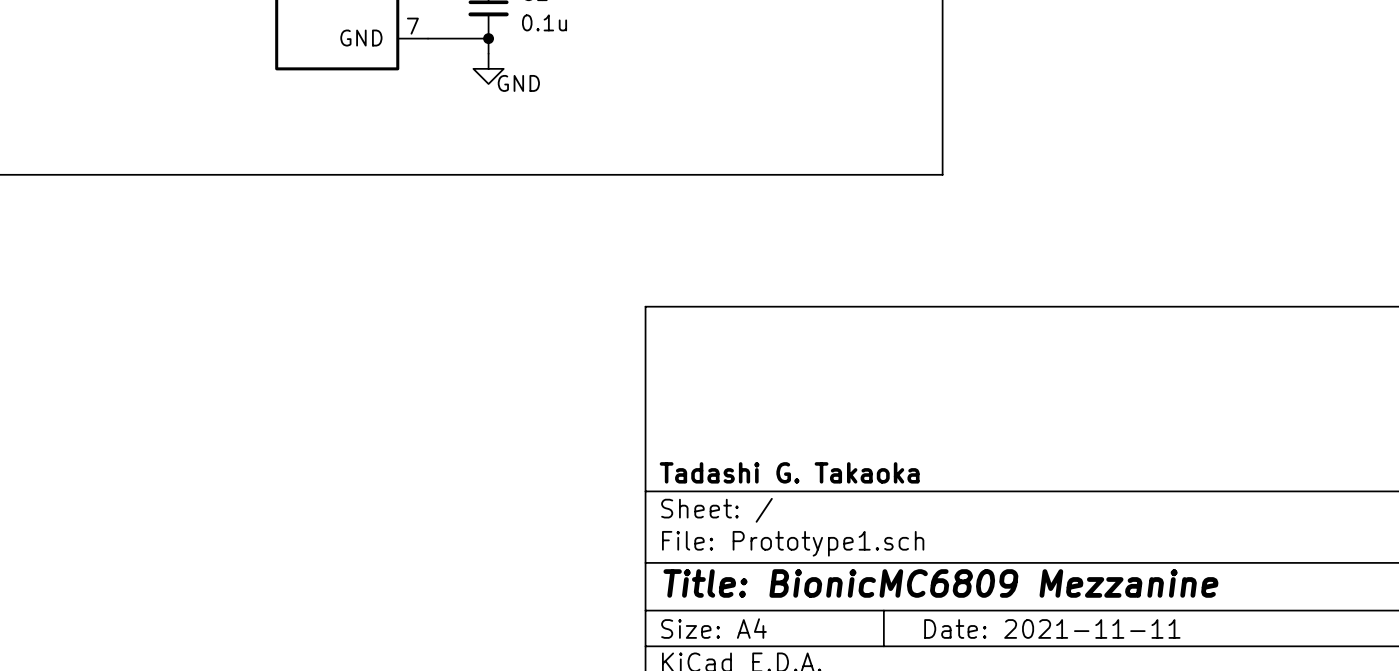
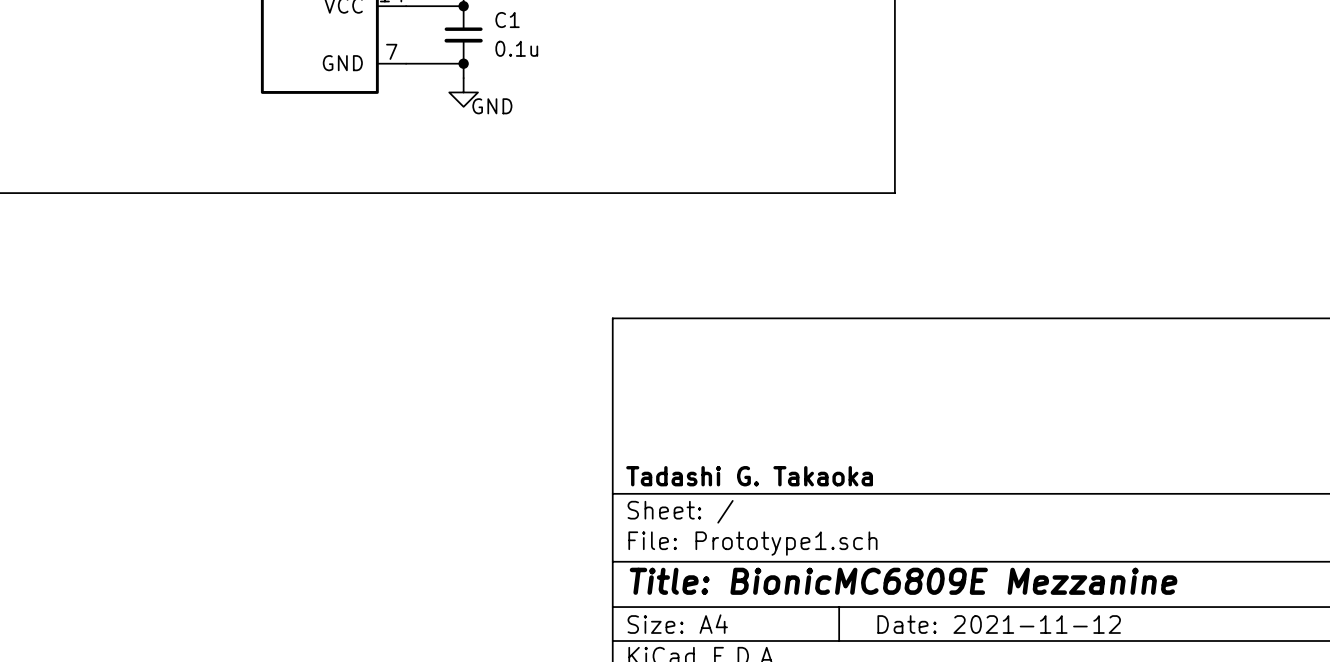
title block: Title: BionicMC6809 Mezzanine (940, 583) -> Title: BionicMC6809E Mezzanine (903, 581)
title block: Date: 2021-11-11 (1052, 628) -> Date: 2021-11-12 (999, 624)

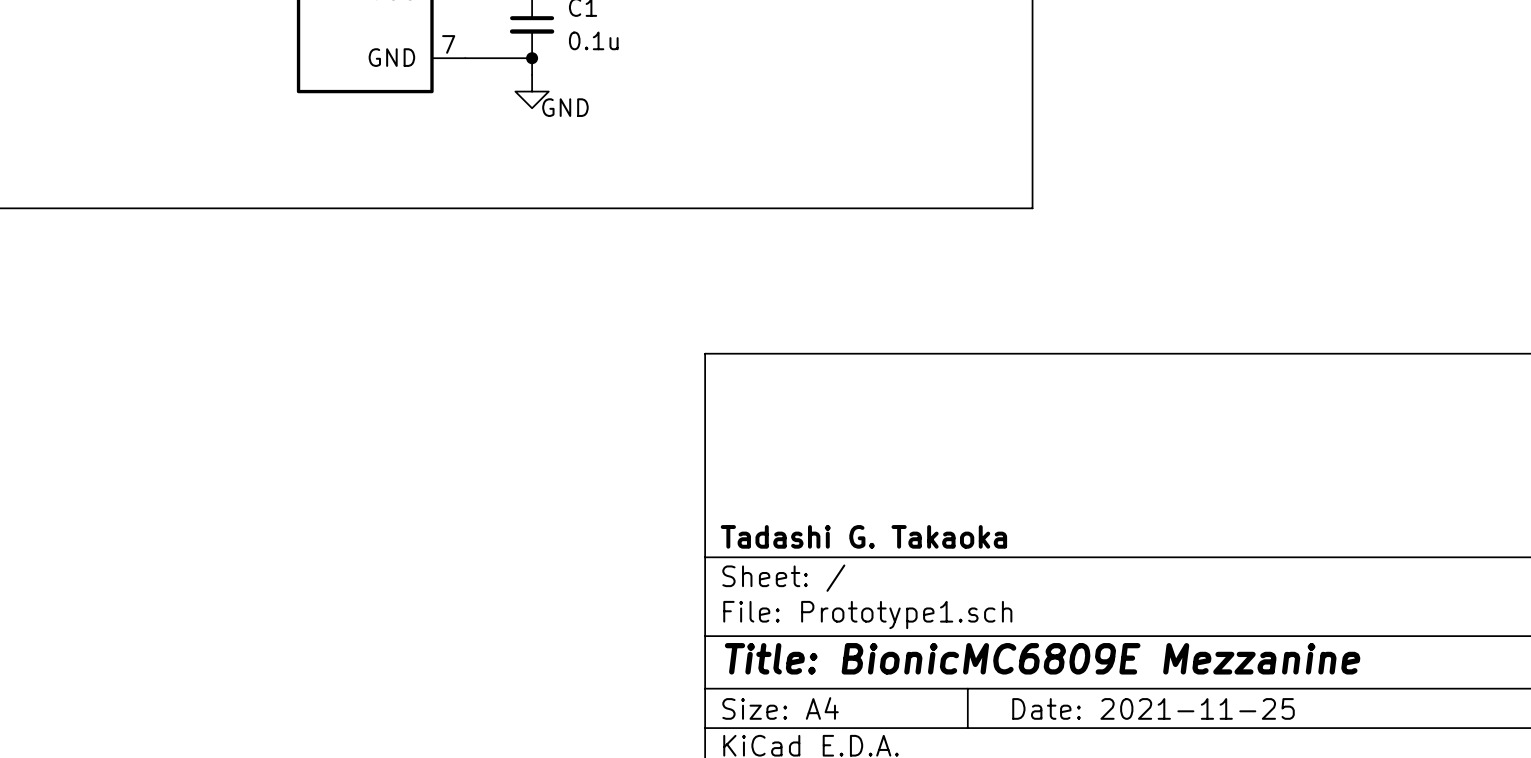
title block: Date: 2021-11-12 (999, 624) -> Date: 2021-11-25 (1153, 708)

